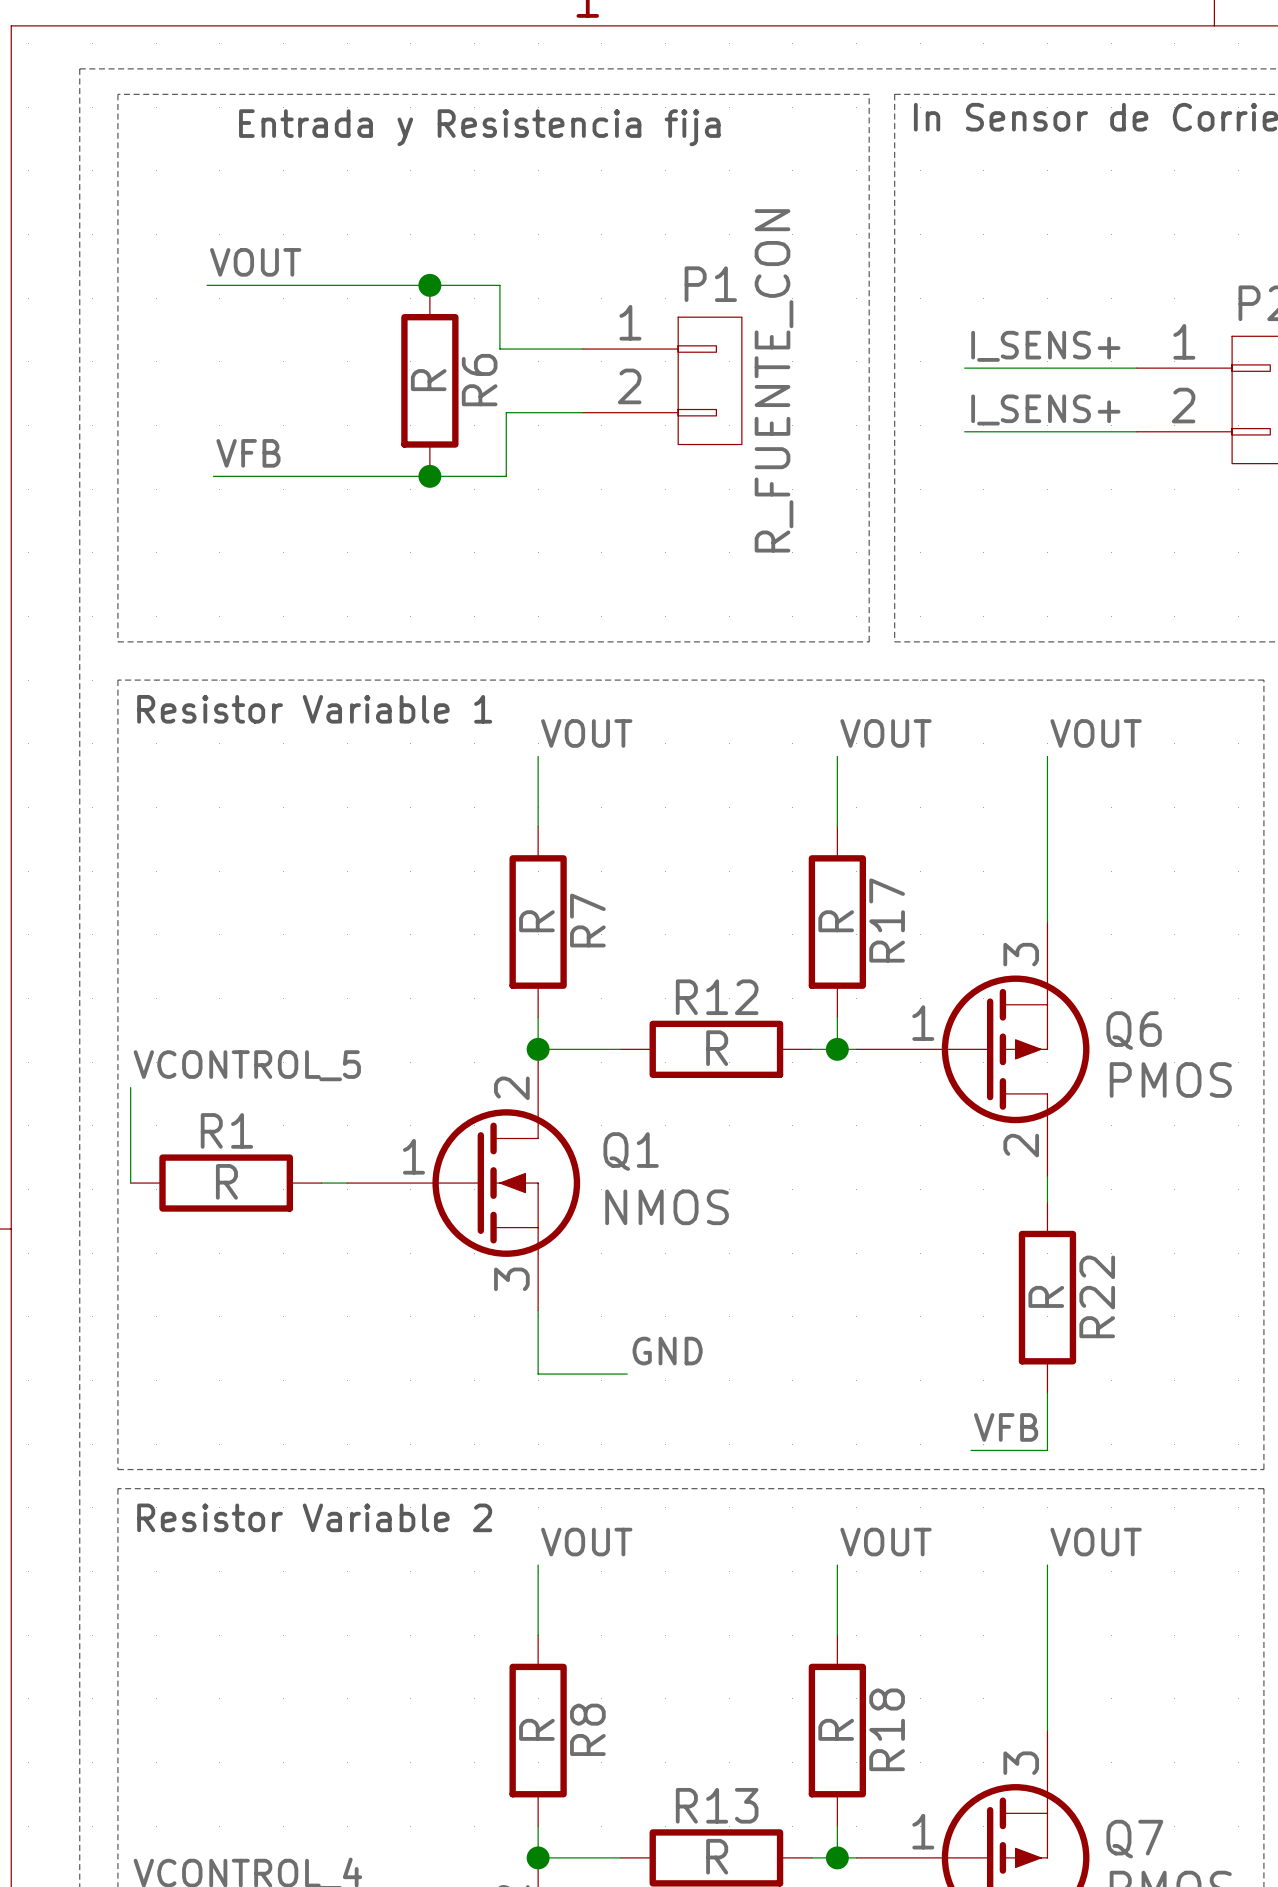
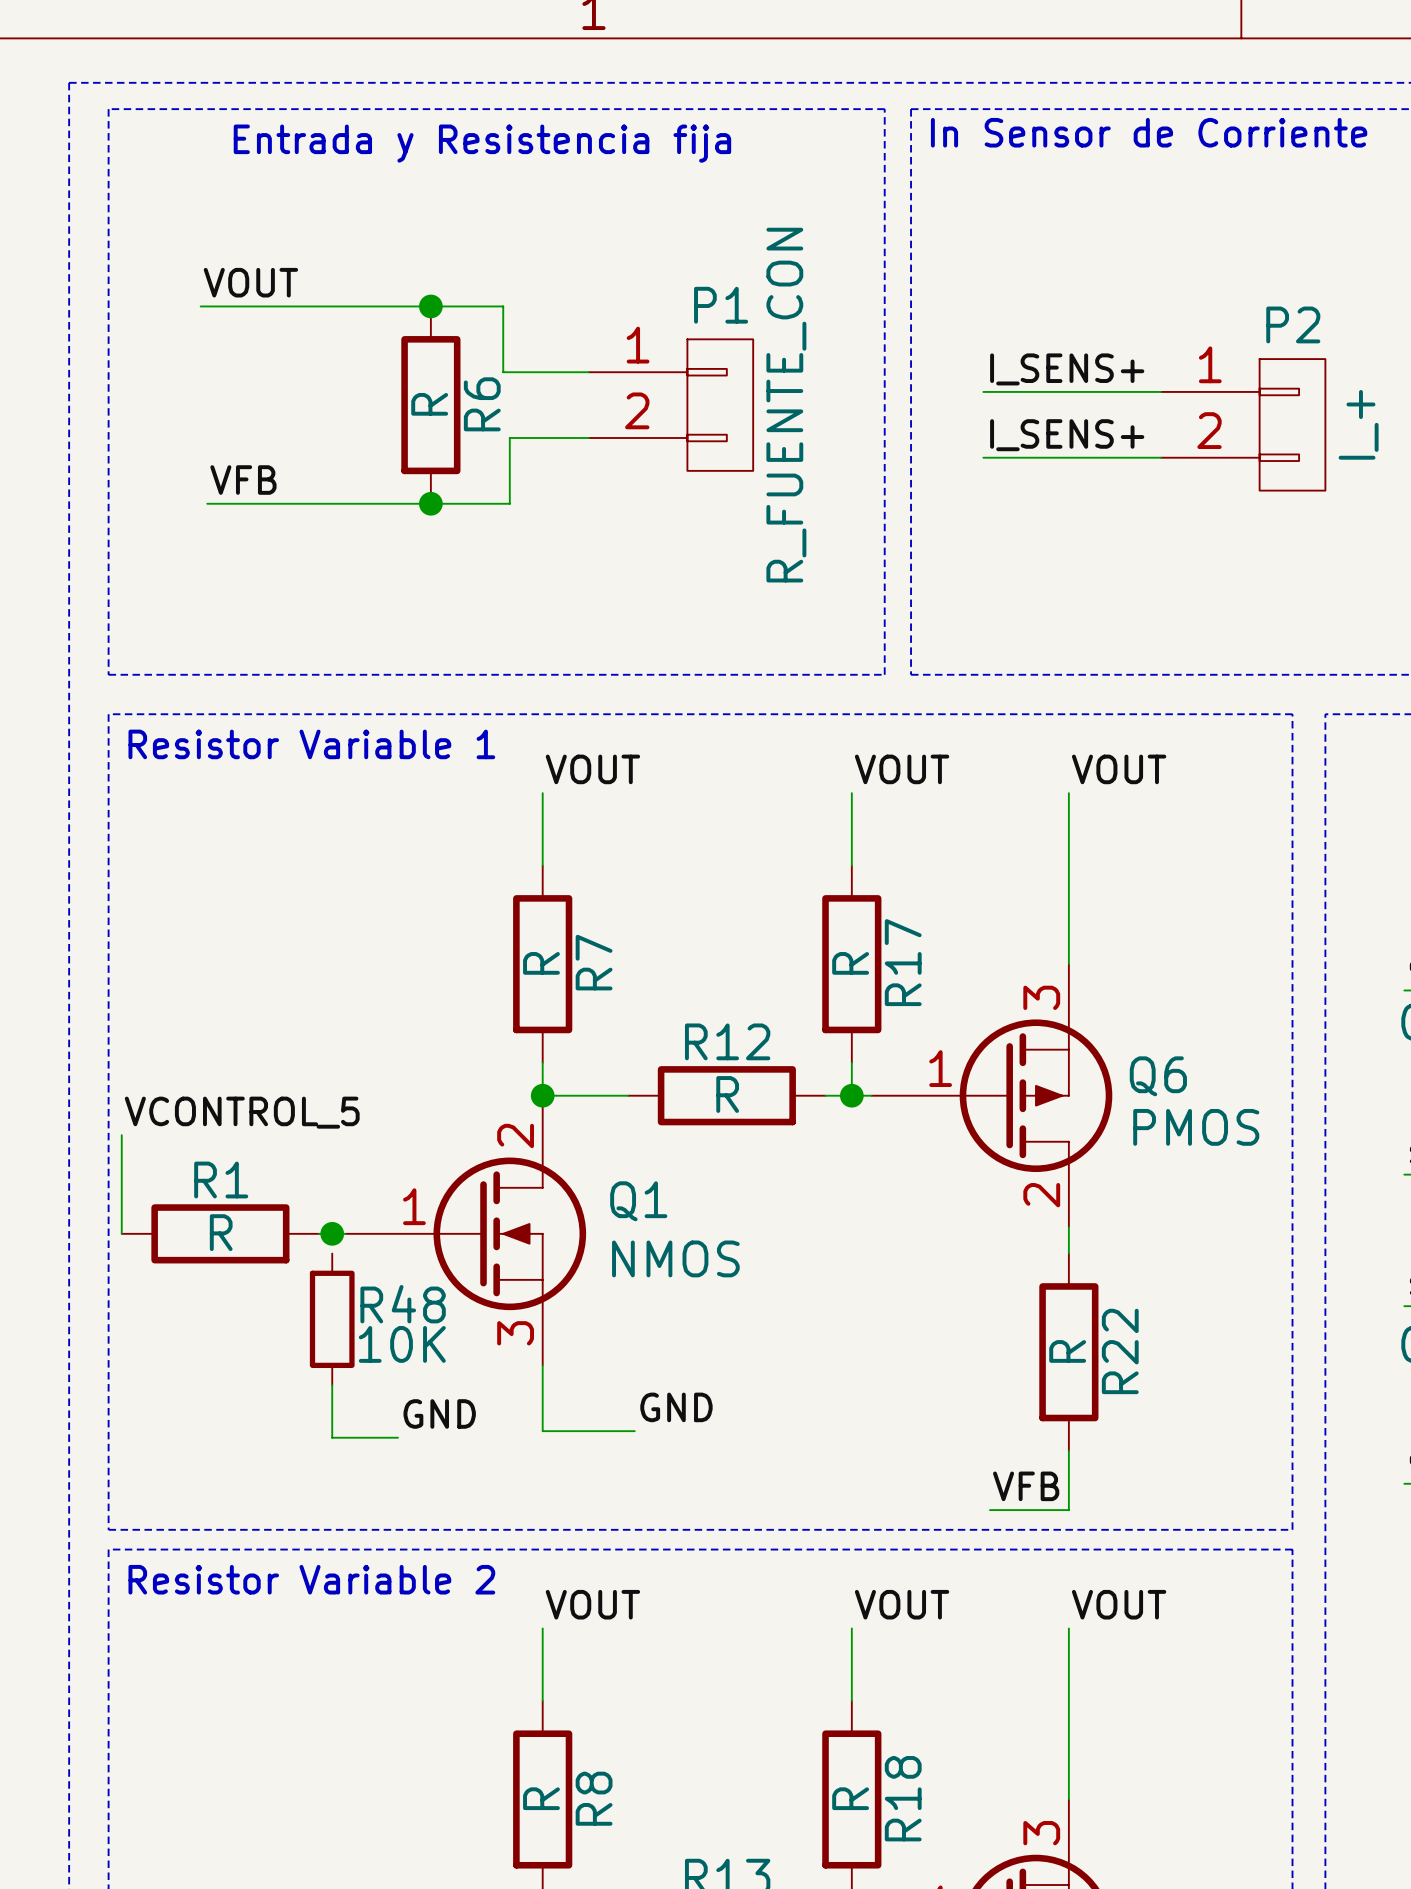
junction: none -> (332, 1233)
R48: none -> 10K (332, 1319)
wire: none -> (332, 1385) (332, 1437) (398, 1437)
label: none -> GND (439, 1413)

